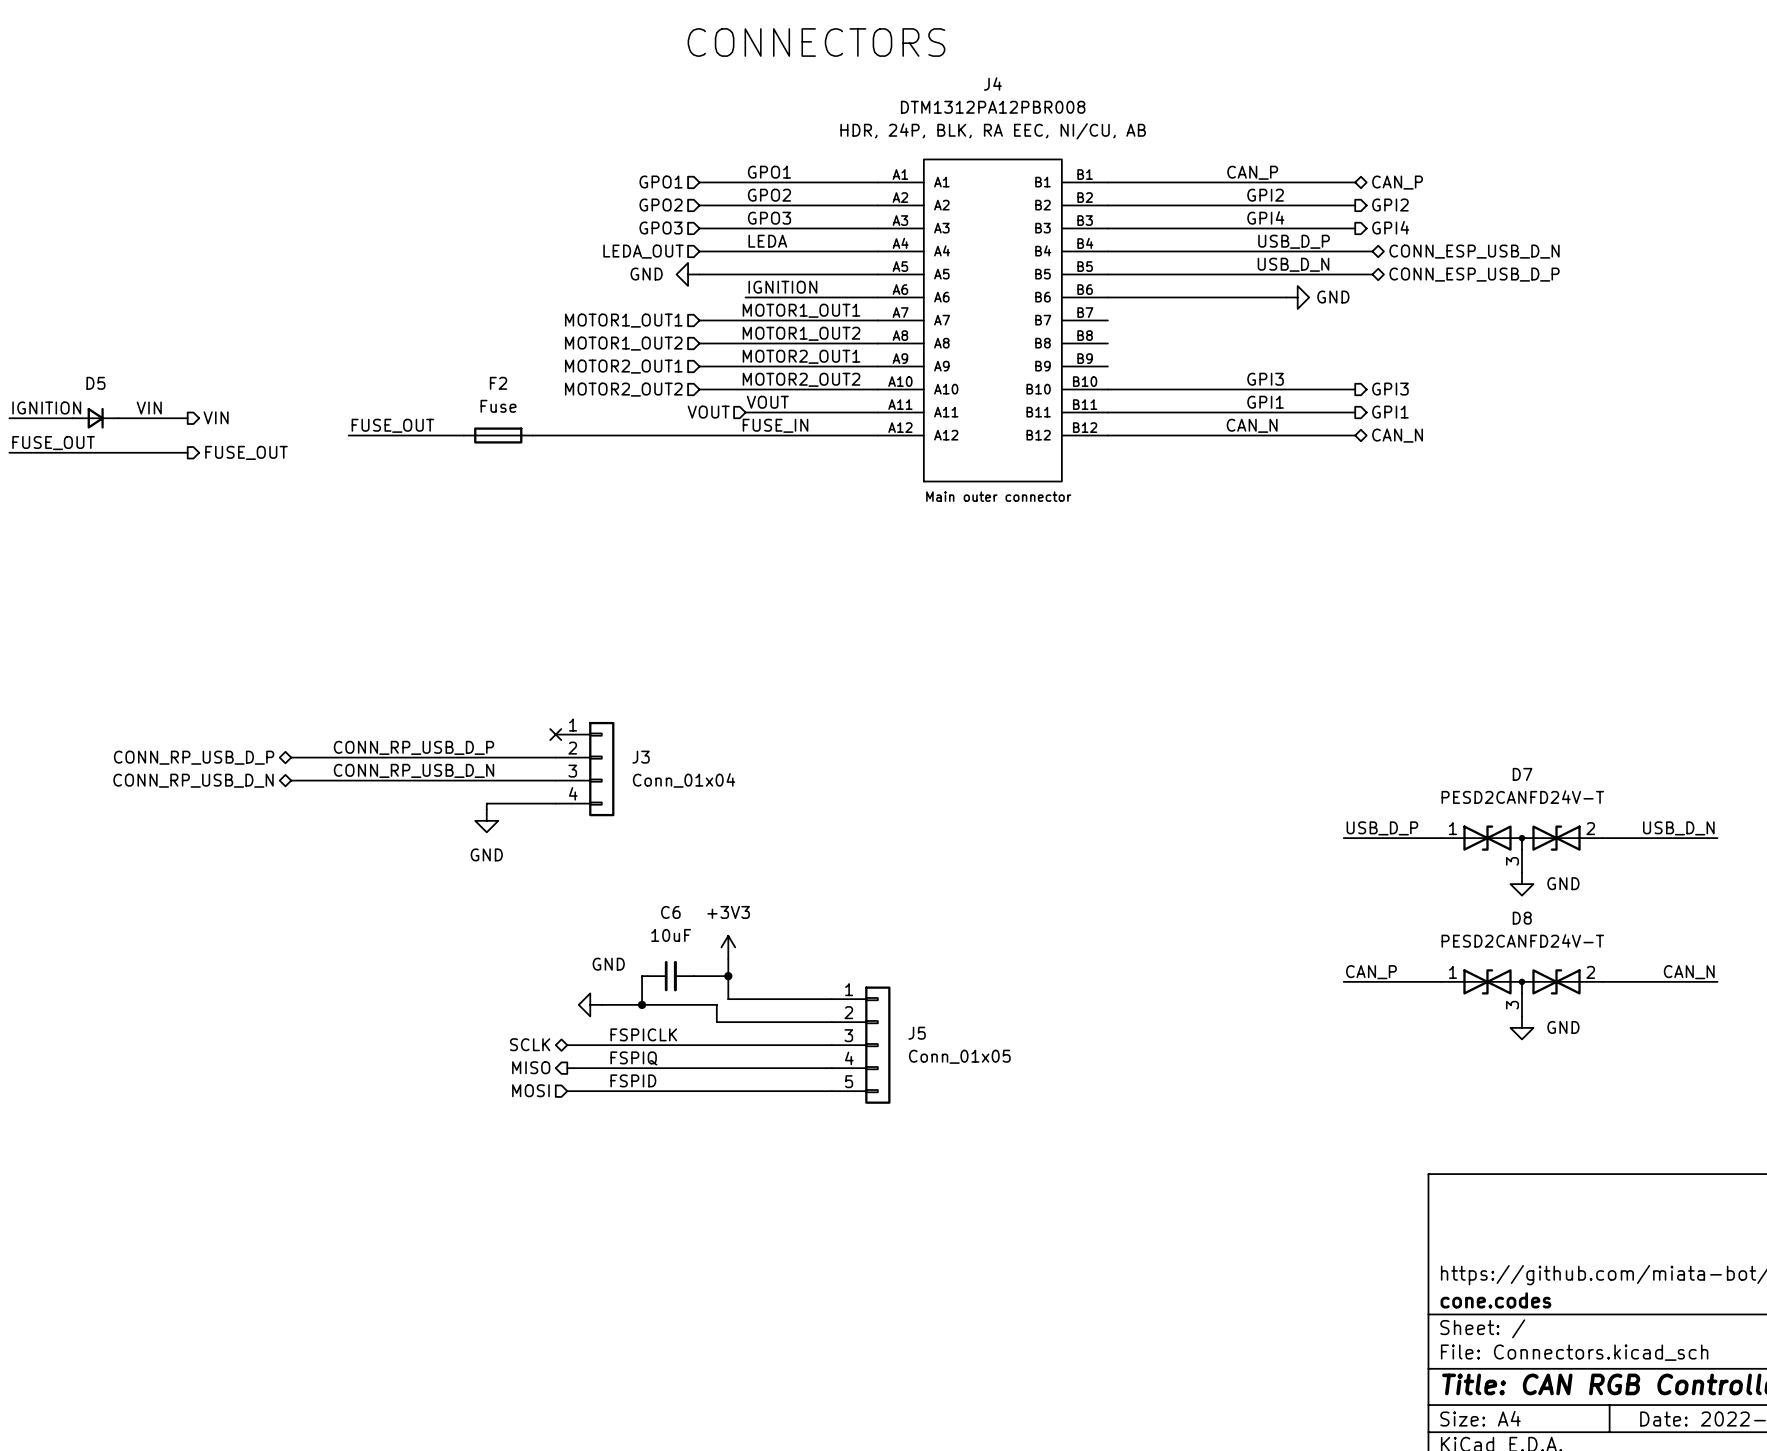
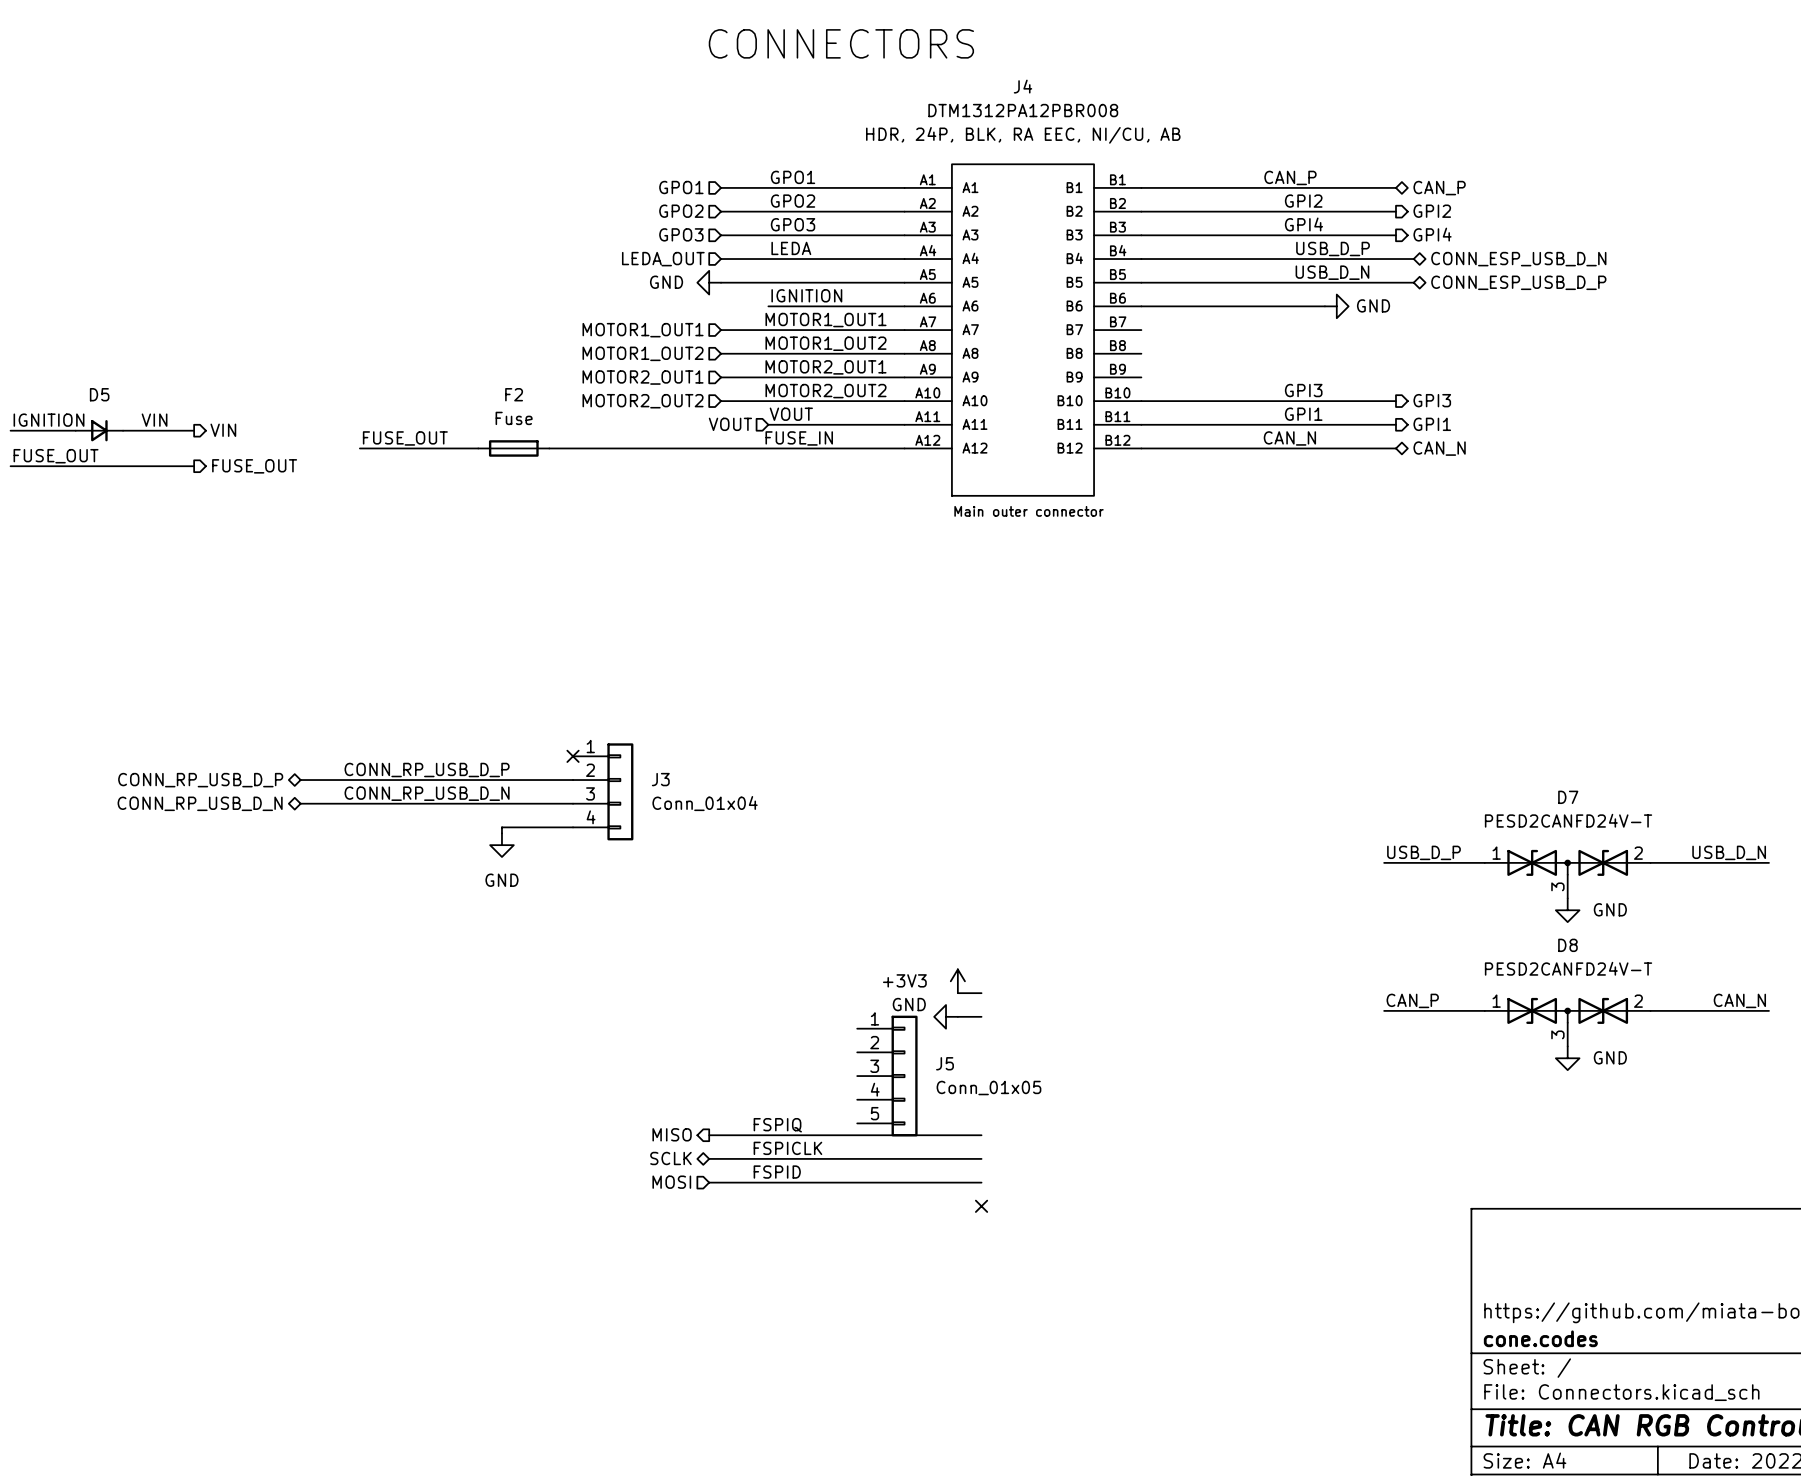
power symbol text position: +3V3 (728, 912) -> +3V3 (904, 980)
power symbol position: +3V3 (728, 947) -> +3V3 (957, 981)
wire: (728, 958) (728, 999) (831, 999) -> none
wire: none -> (957, 993) (981, 993)
wire: (647, 976) (642, 976) (642, 1004) -> none
C6: 10uF (670, 976) -> none
wire: (693, 976) (728, 976) -> none
junction: (728, 976) -> none
power symbol: none -> GND (946, 1016)
wire: none -> (957, 1016) (981, 1016)
power symbol: GND (590, 1004) -> none
wire: (601, 1004) (716, 1004) (716, 1022) (831, 1022) -> none
junction: (642, 1004) -> none
label position: FSPICLK (643, 1034) -> FSPICLK (787, 1148)
hierarchical label position: SCLK (530, 1044) -> SCLK (670, 1158)
wire: (567, 1045) (831, 1045) -> (709, 1135) (981, 1135)
label position: FSPIQ (633, 1058) -> FSPIQ (777, 1125)
hierarchical label position: MISO (531, 1067) -> MISO (672, 1134)
wire: (567, 1068) (831, 1068) -> (709, 1158) (981, 1158)
label position: FSPID (633, 1080) -> FSPID (777, 1172)
hierarchical label position: MOSI (530, 1090) -> MOSI (671, 1182)
wire: (567, 1091) (831, 1091) -> (709, 1182) (981, 1182)
no-connect mark: none -> (981, 1206)

